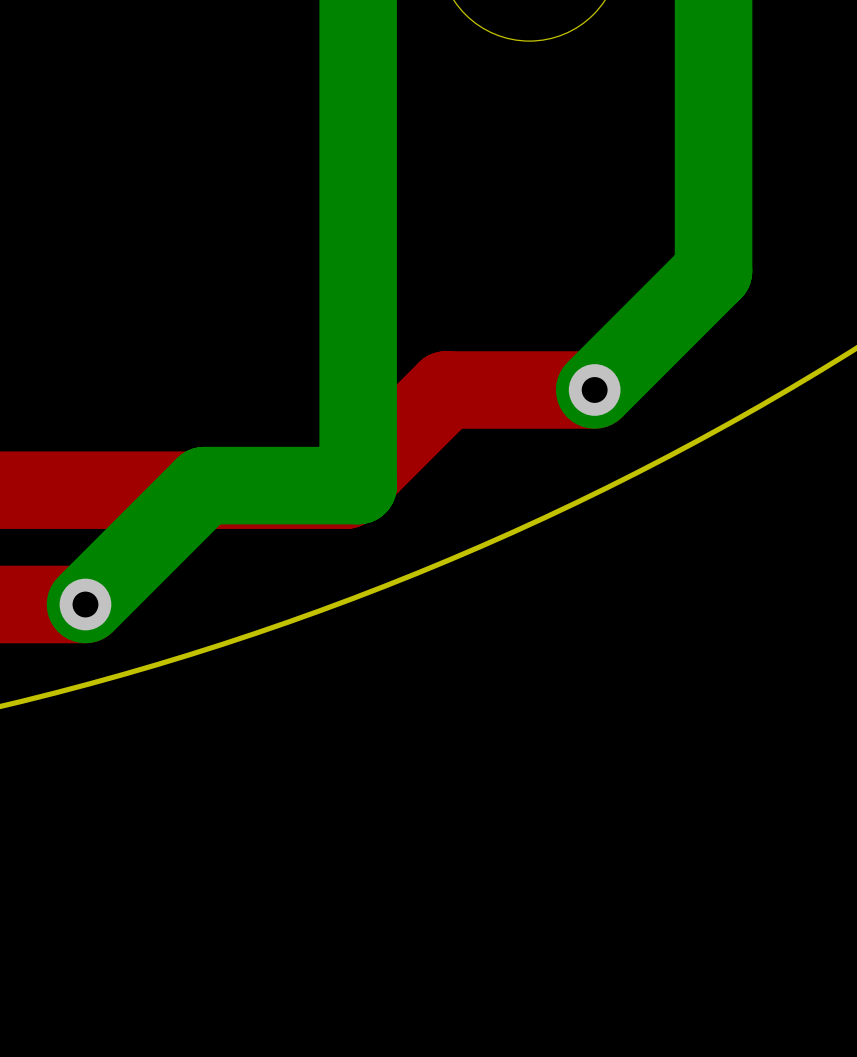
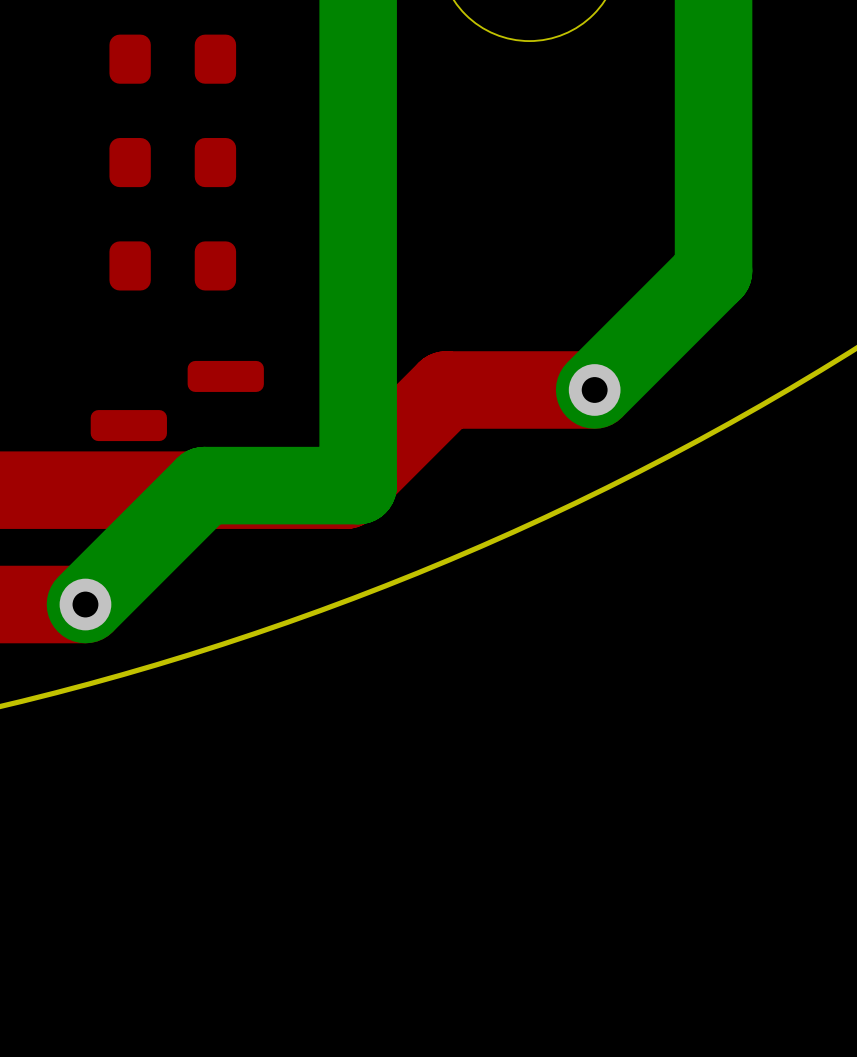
part: none -> (172, 59)
part: none -> (172, 162)
part: none -> (172, 265)
part: none -> (177, 425)

